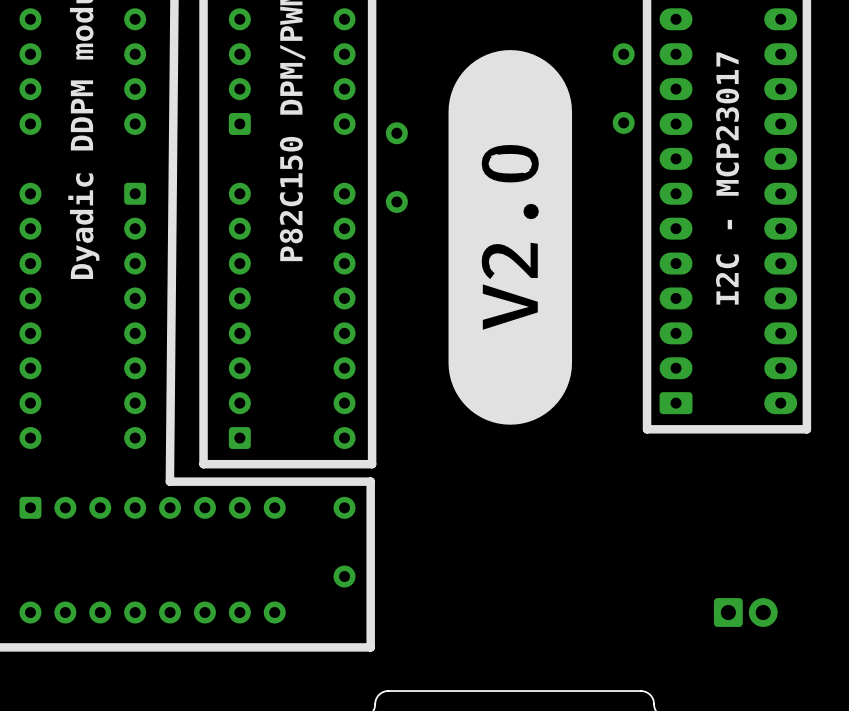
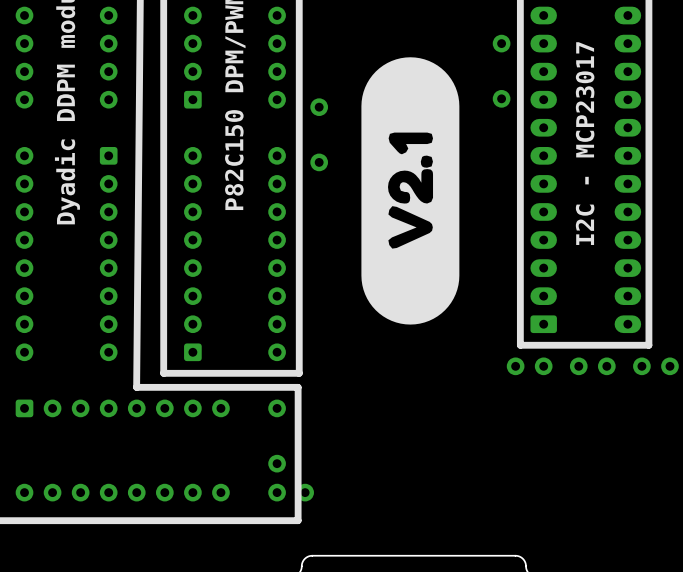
drawing shape: [448, 50, 573, 425] -> [361, 57, 460, 325]
part: none -> (529, 366)
part: none -> (592, 366)
part: none -> (655, 366)
part: none -> (291, 492)
part: (745, 612) -> none

